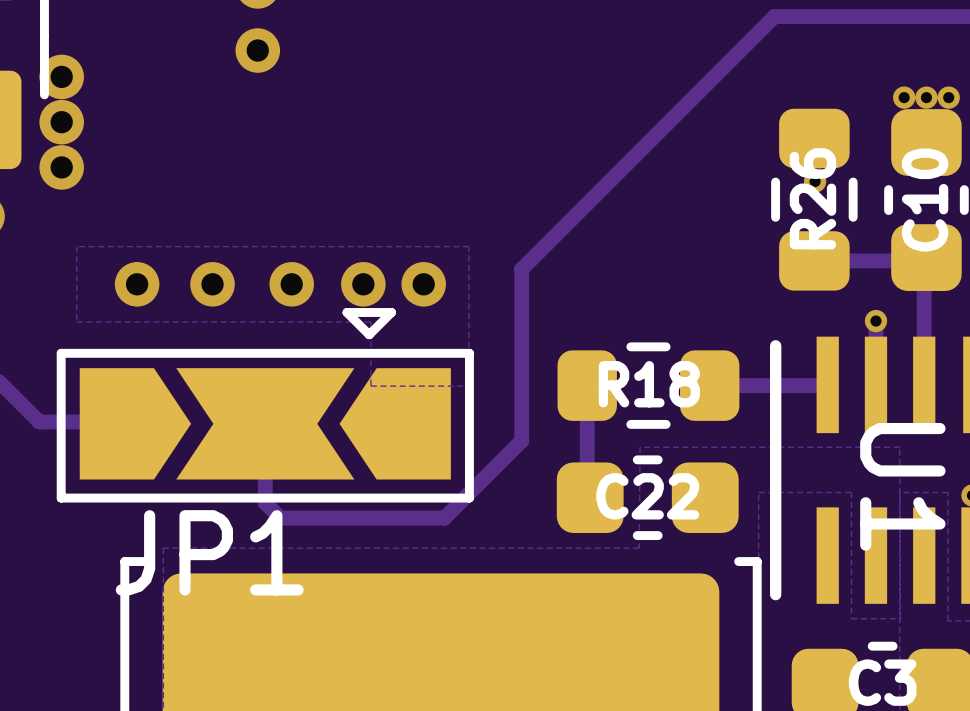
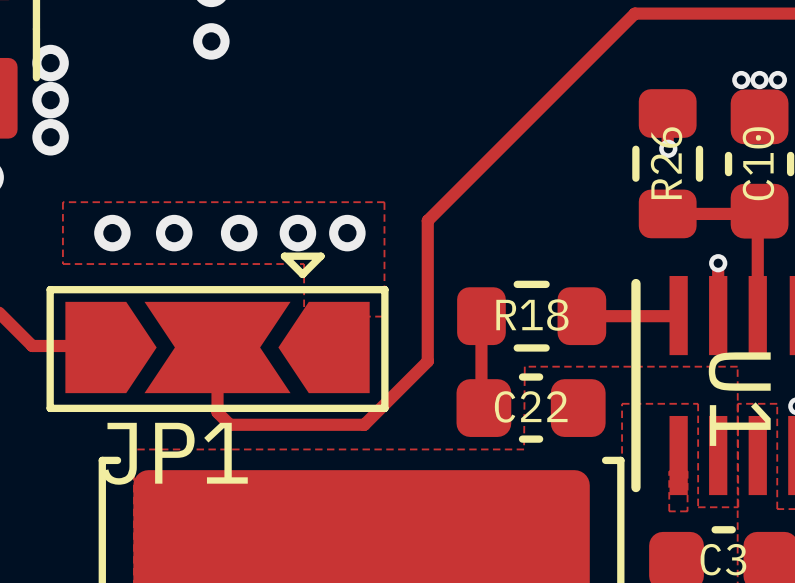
zone outline: none -> (669, 471) (687, 471) (687, 511) (669, 511) (669, 471)

